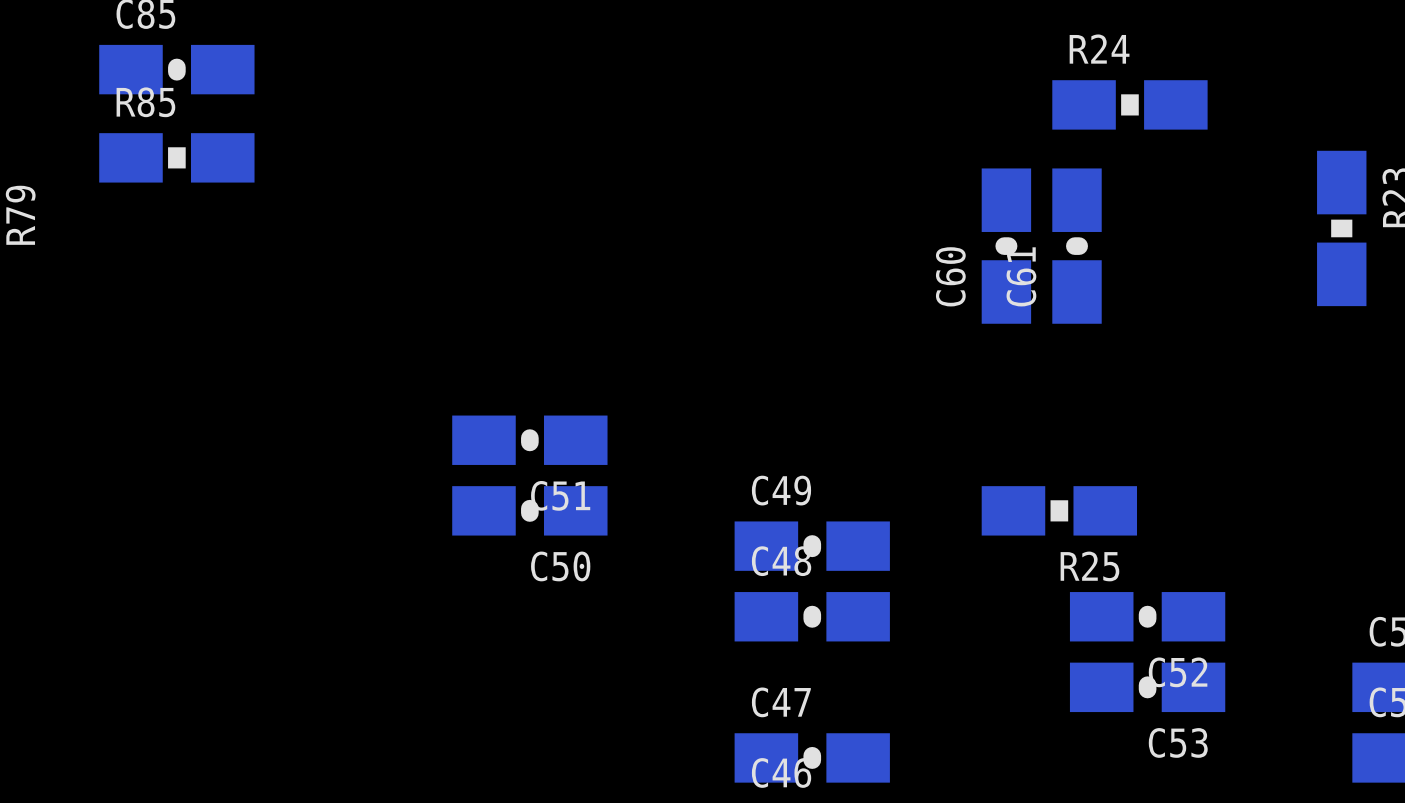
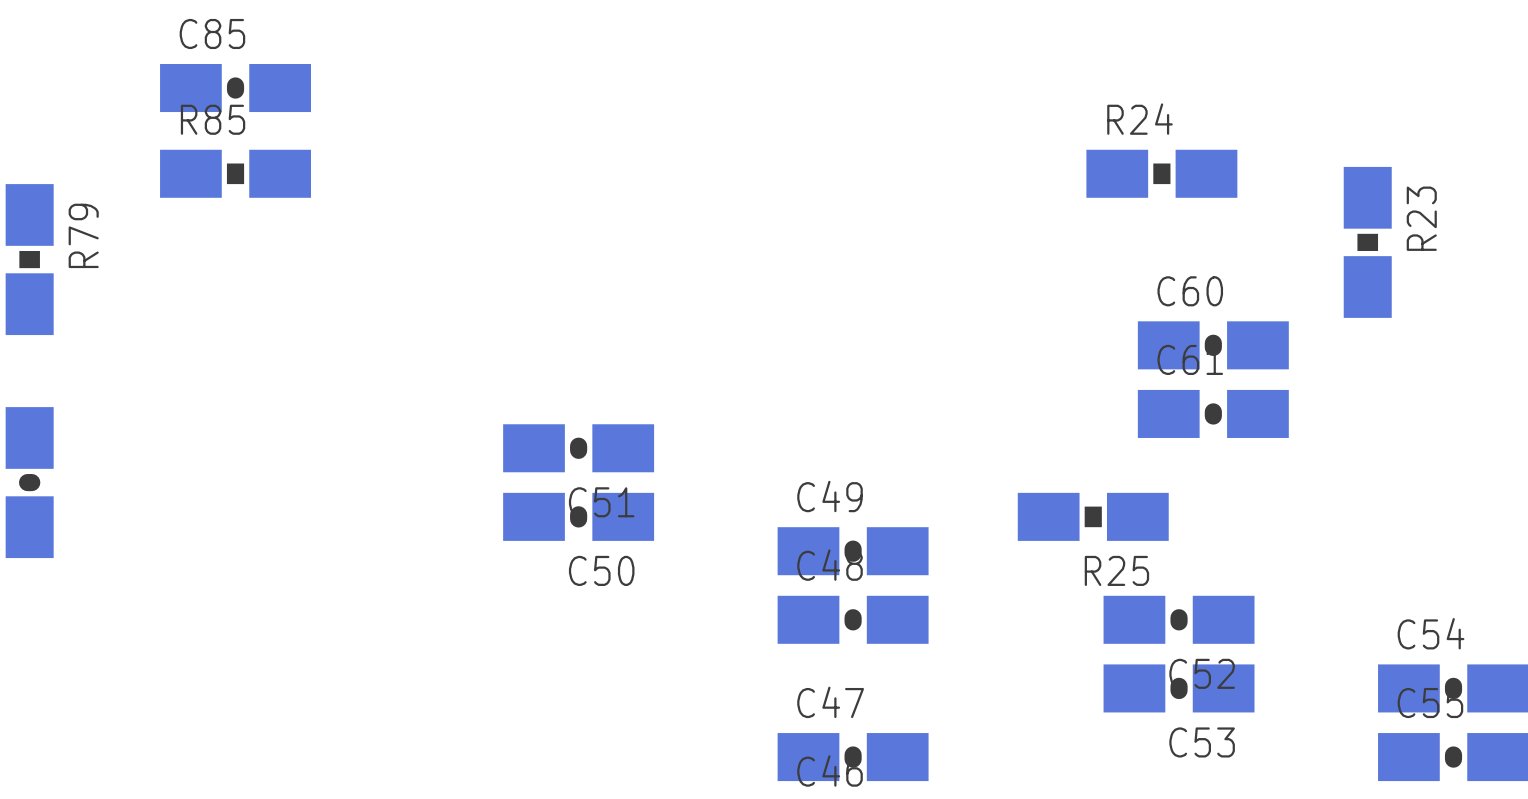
R24 position: (1129, 104) -> (1161, 173)
C60 rotation: 0° (1006, 246) -> 90° clockwise (1213, 345)
C60 position: (1006, 246) -> (1213, 345)
C61 rotation: 0° (1077, 246) -> 90° clockwise (1213, 413)
C61 position: (1077, 246) -> (1213, 413)

